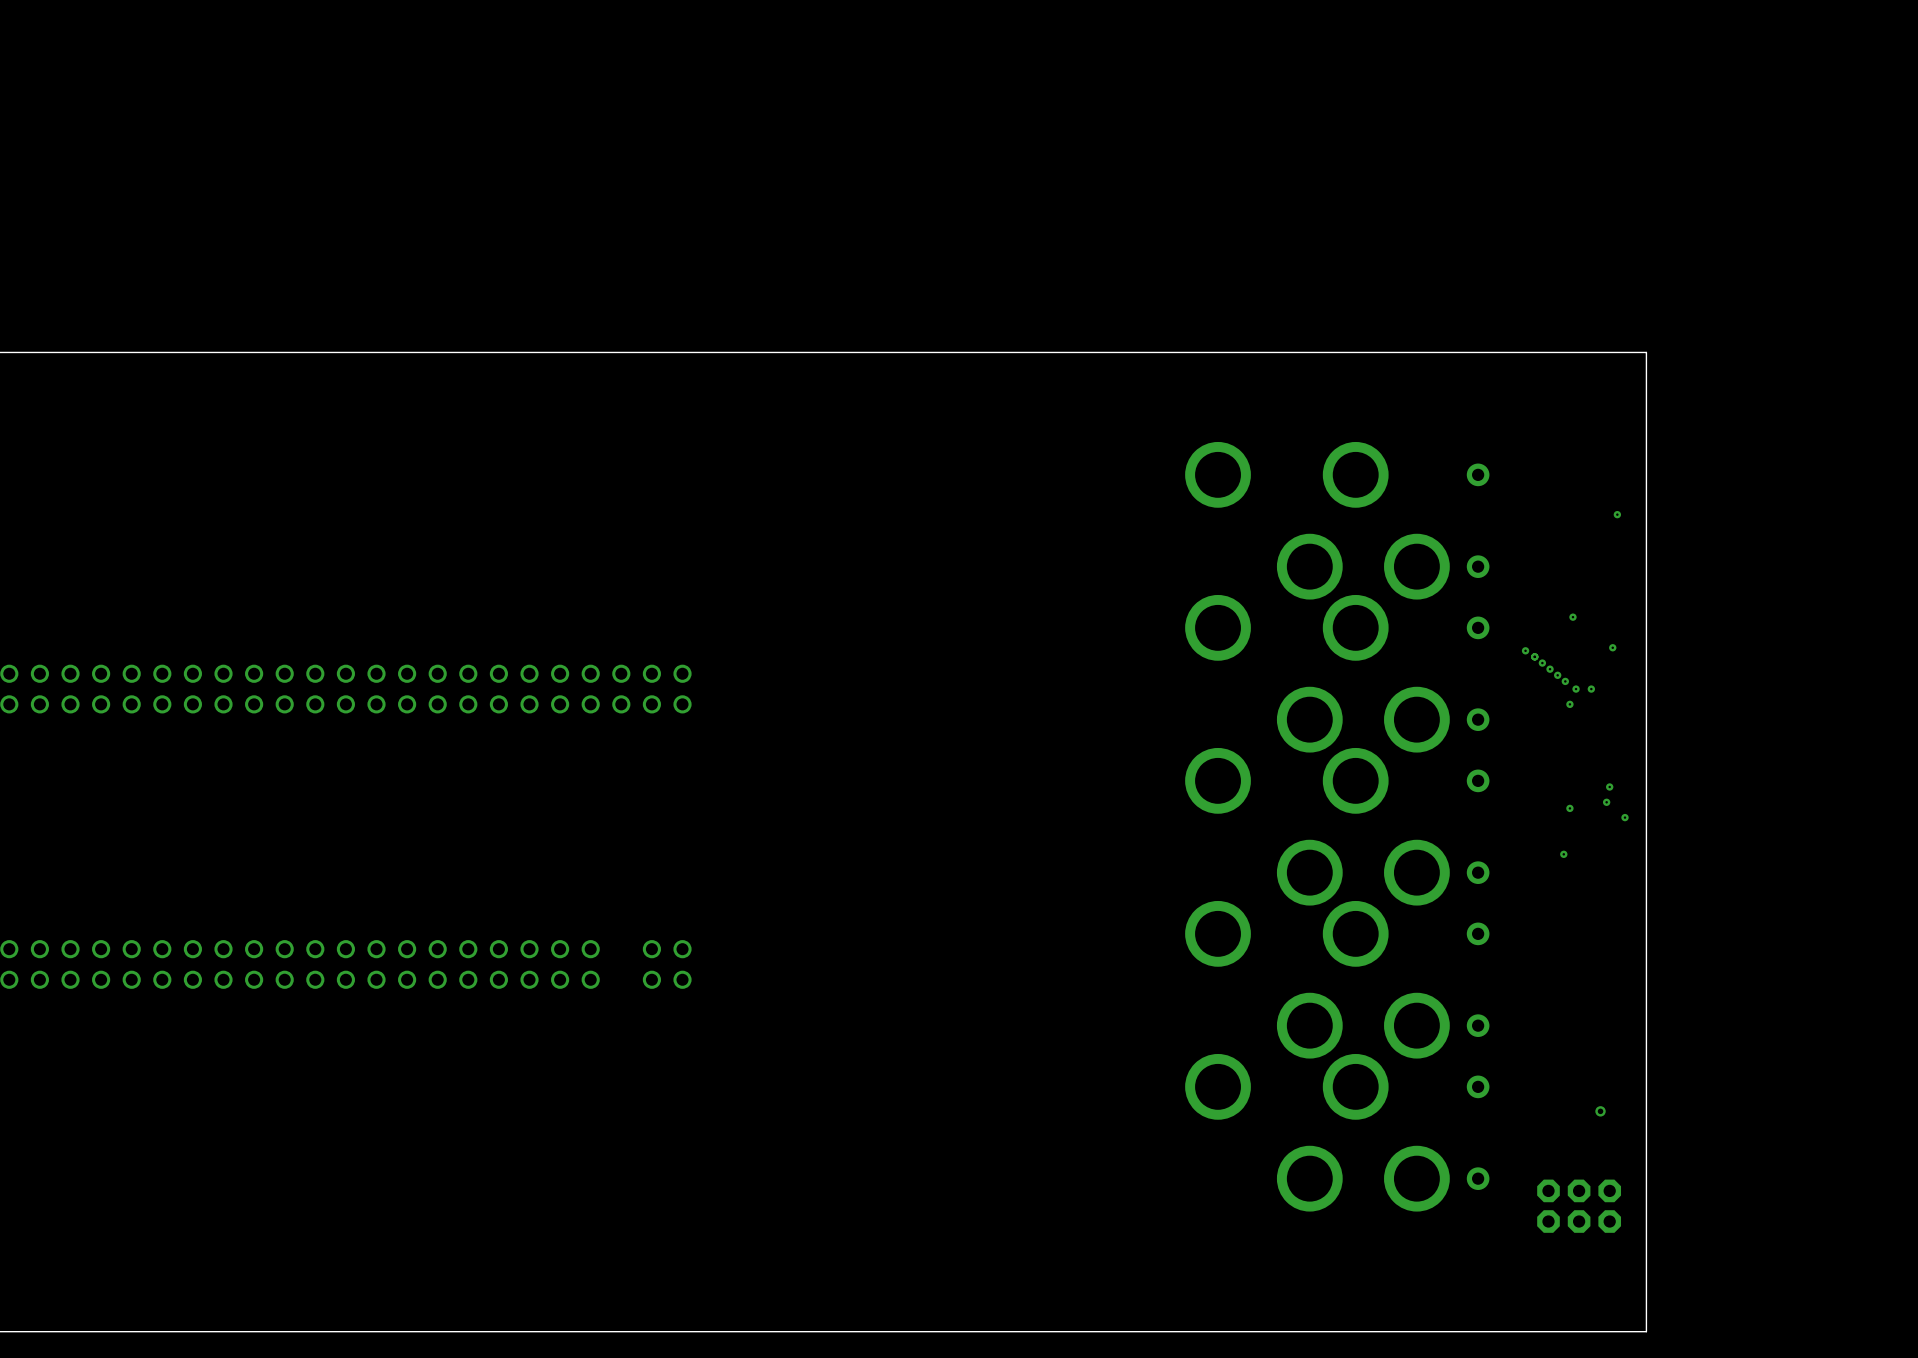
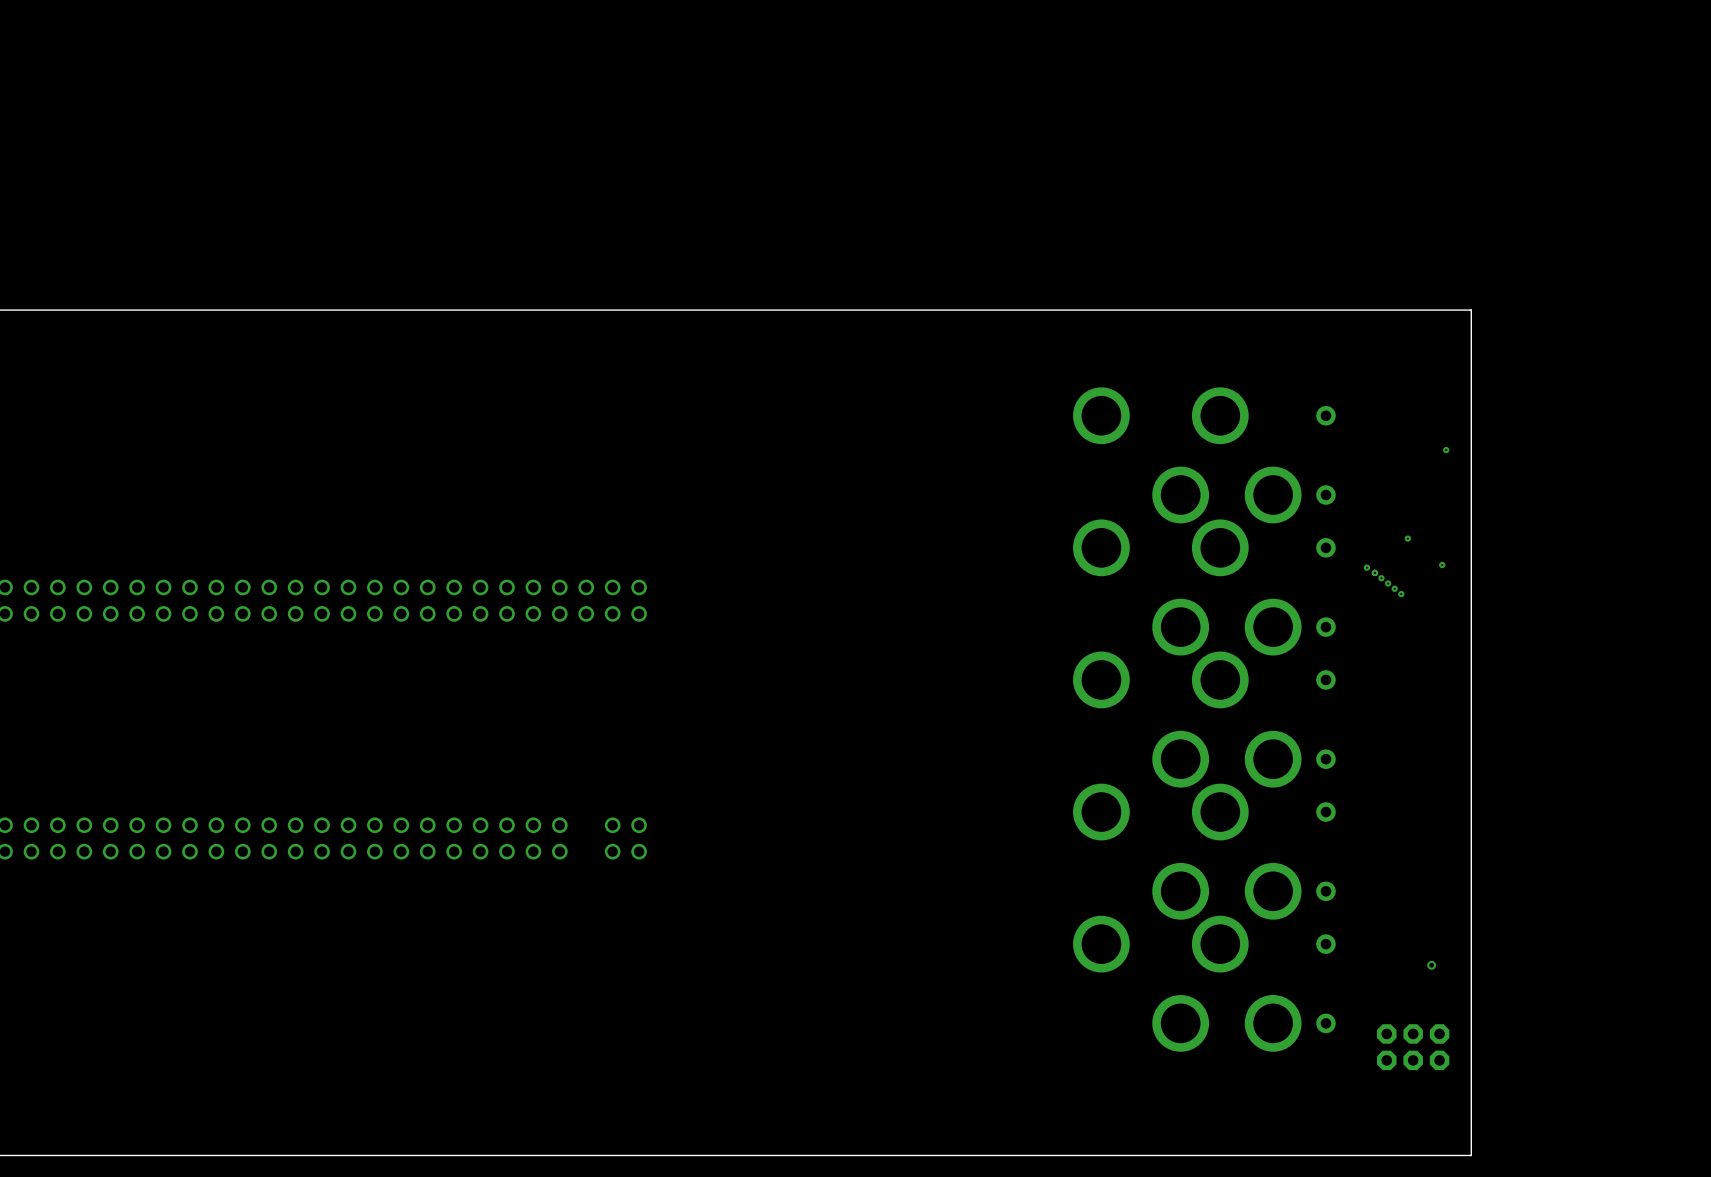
via: (1576, 689) -> none
via: (1591, 689) -> none
via: (1569, 704) -> none
via: (1609, 786) -> none
via: (1606, 802) -> none
via: (1569, 808) -> none
via: (1625, 817) -> none
via: (1563, 854) -> none

